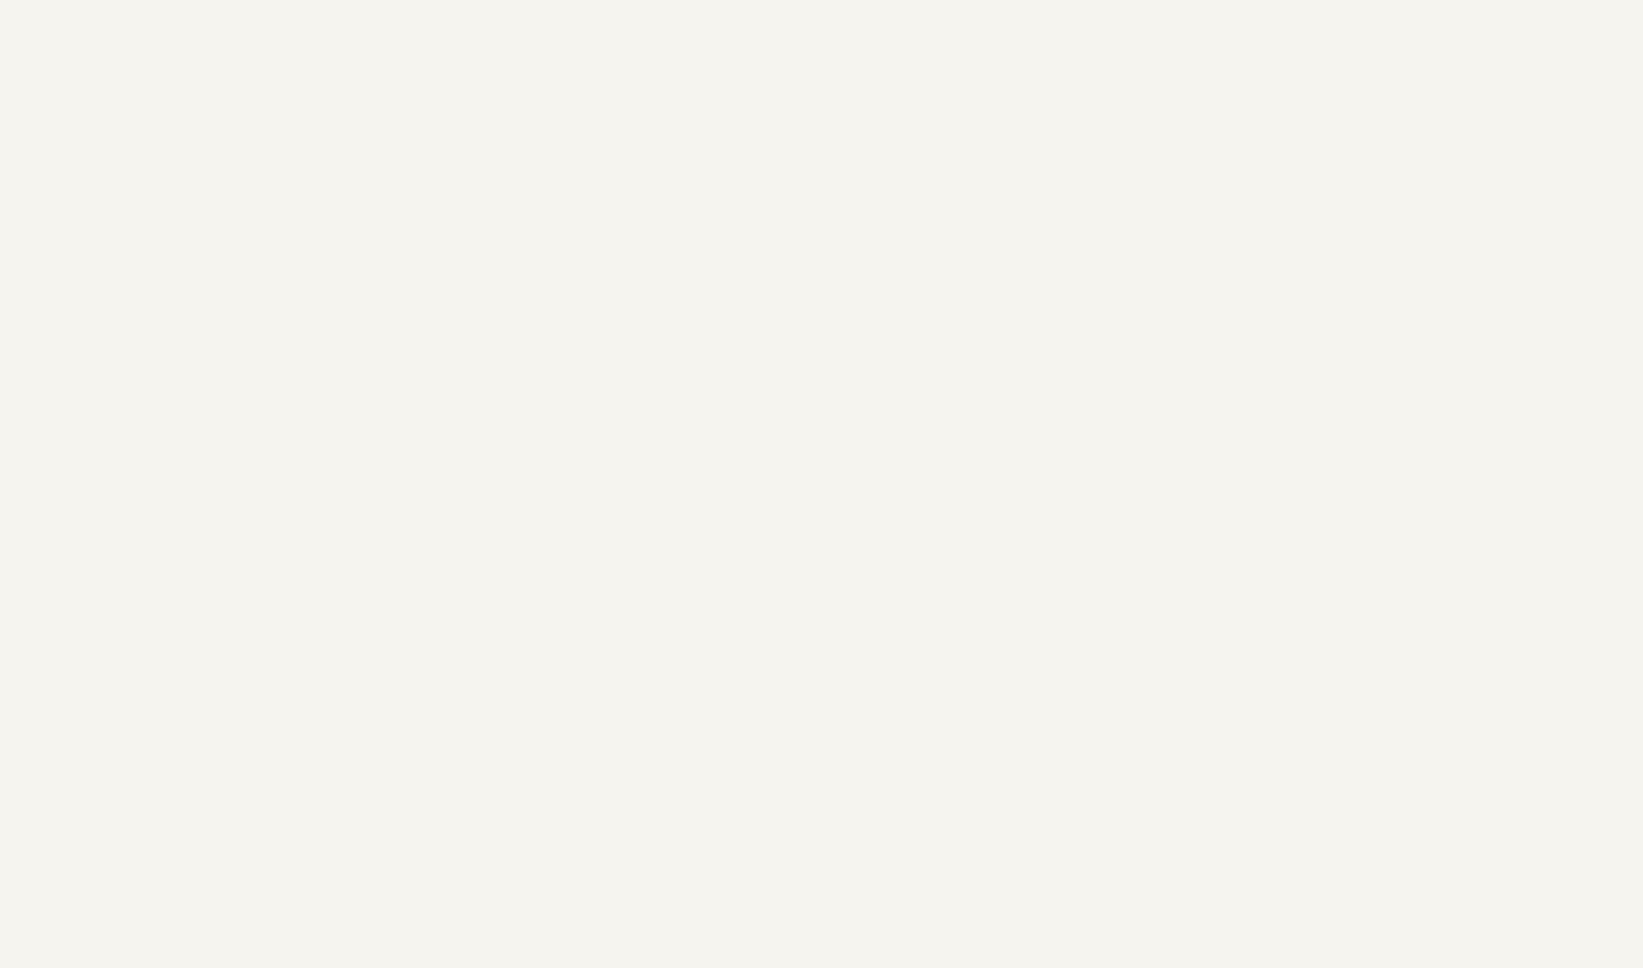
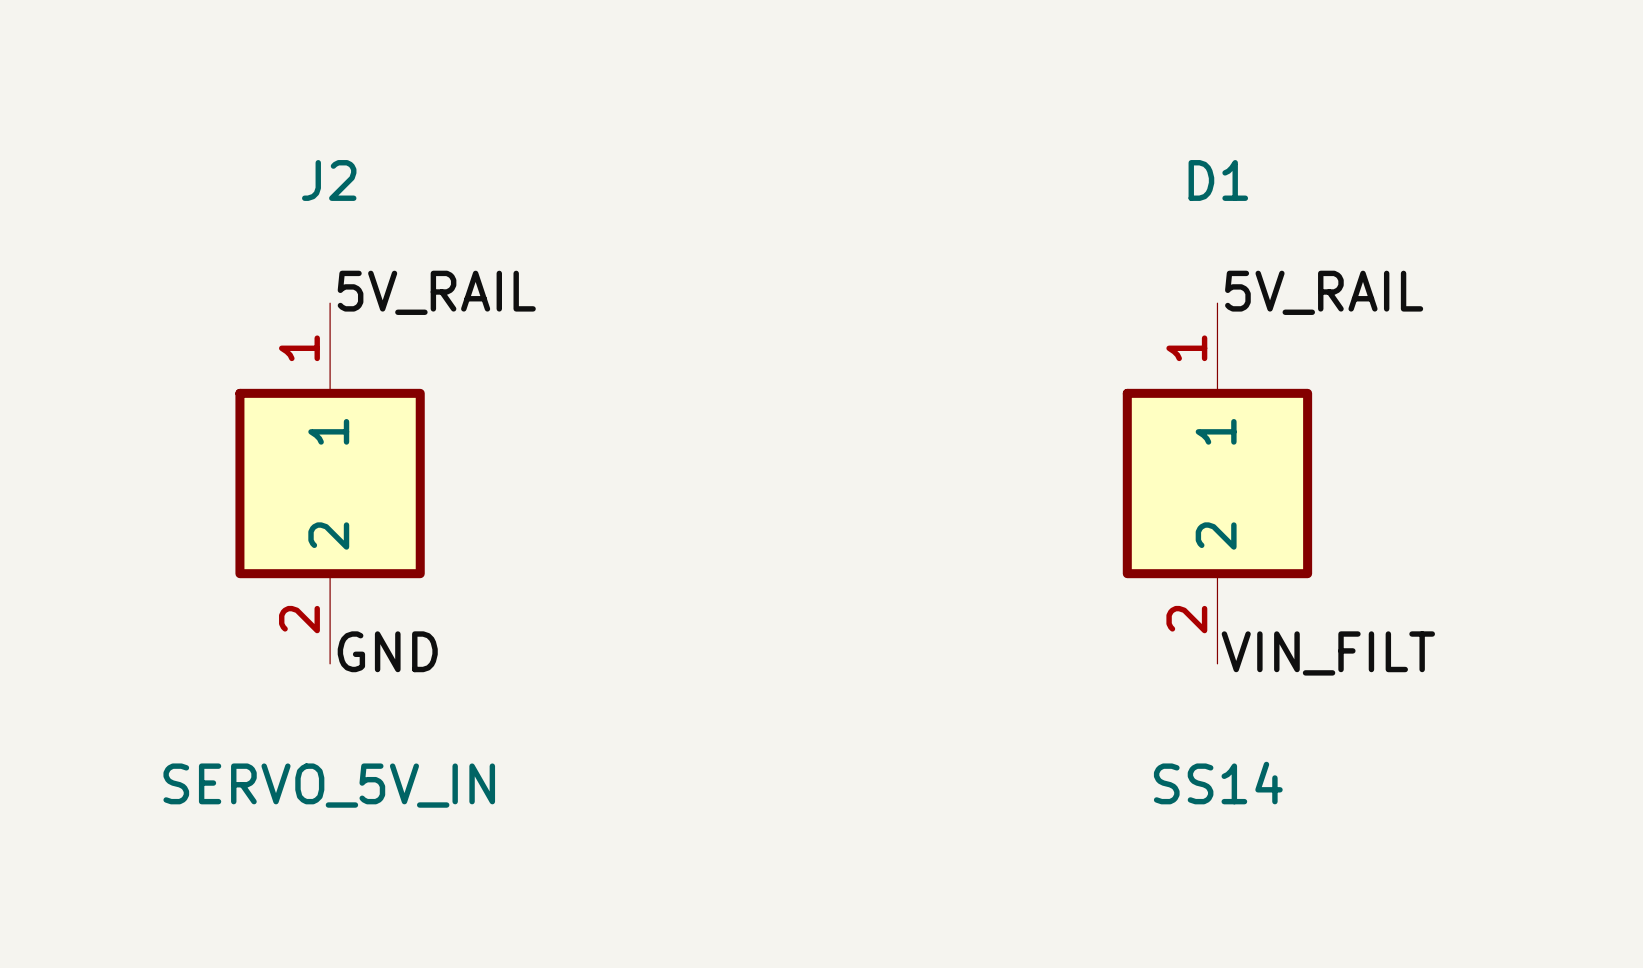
label: none -> 5V_RAIL (436, 292)
label: none -> 5V_RAIL (1324, 292)
J2: none -> SERVO_5V_IN (330, 483)
D1: none -> SS14 (1217, 483)
label: none -> GND (387, 651)
label: none -> VIN_FILT (1328, 653)

